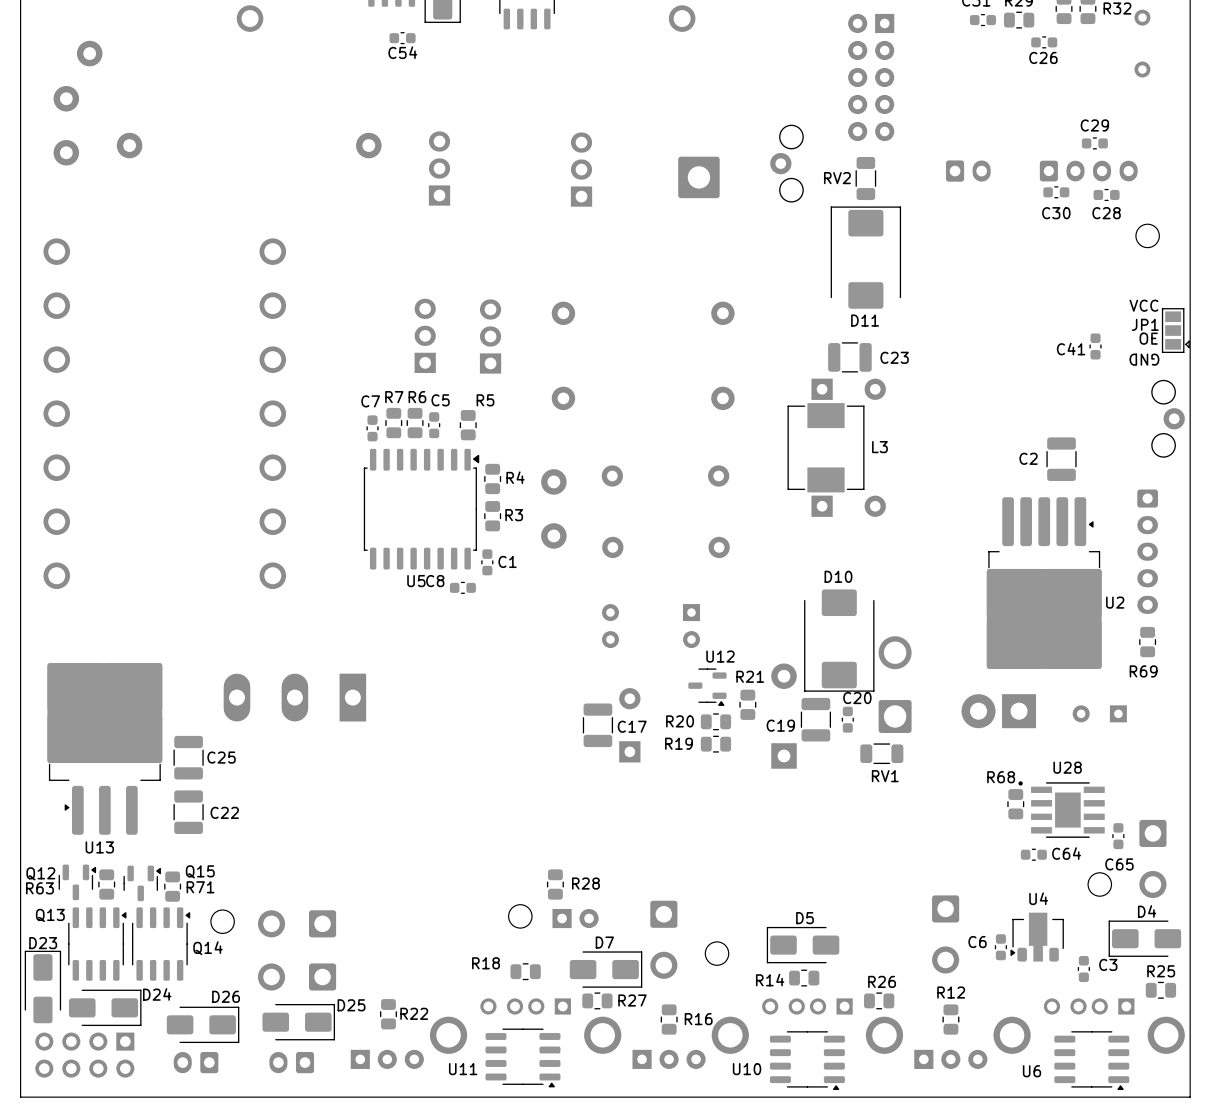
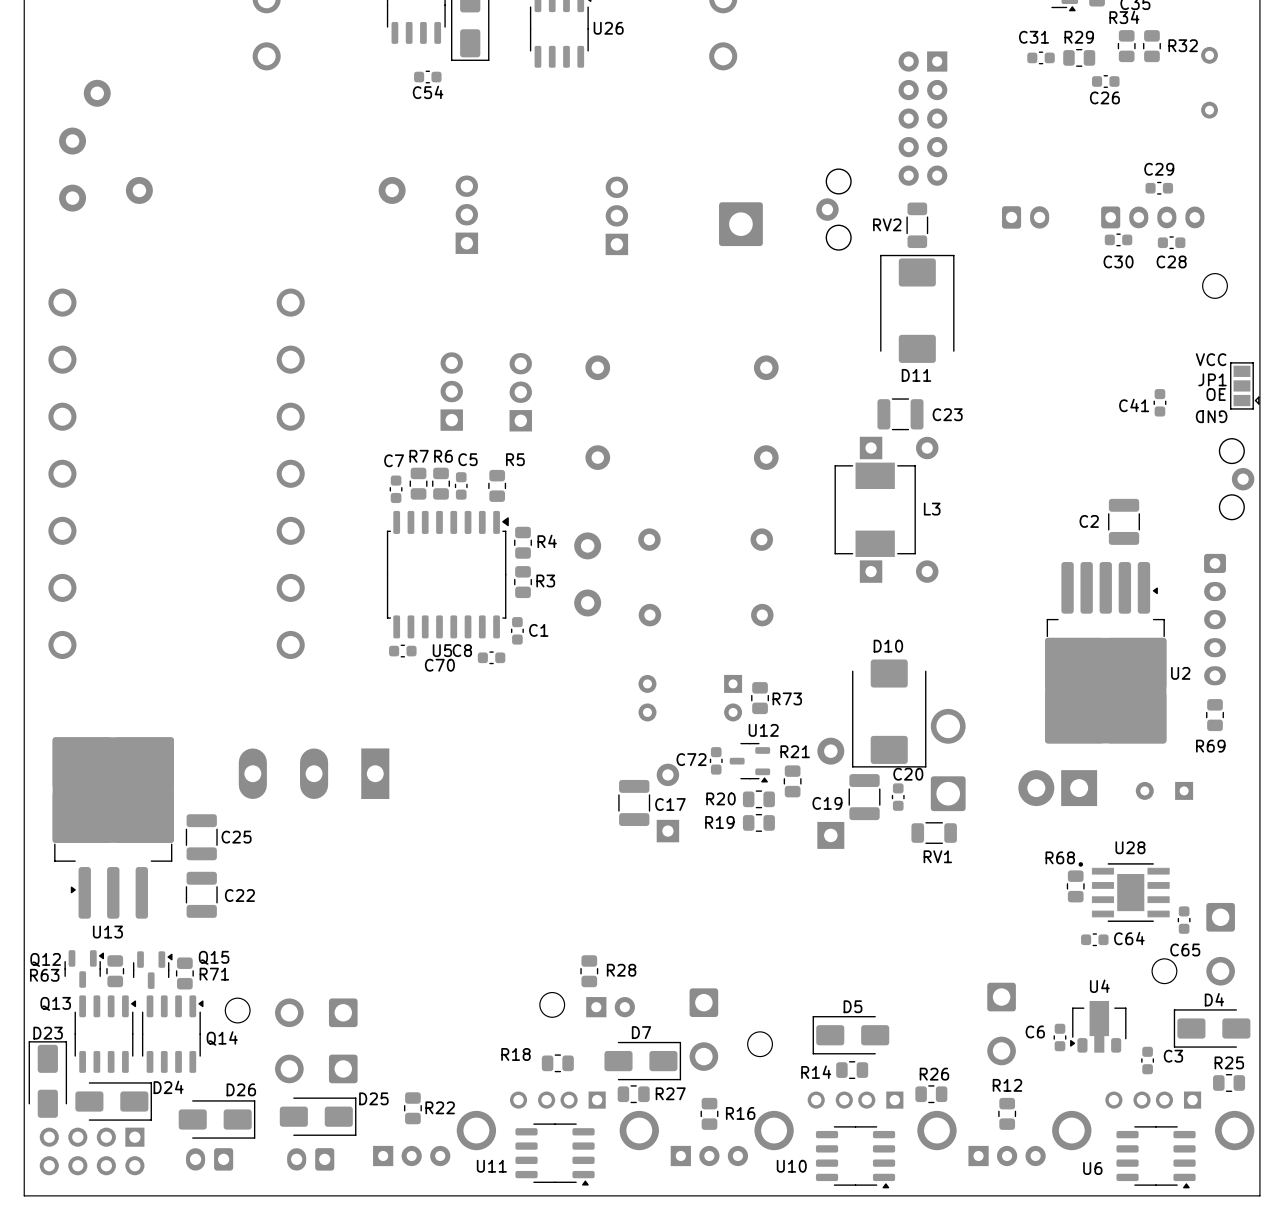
C70: none -> (402, 651)
R73: none -> (760, 698)
C72: none -> (716, 760)

